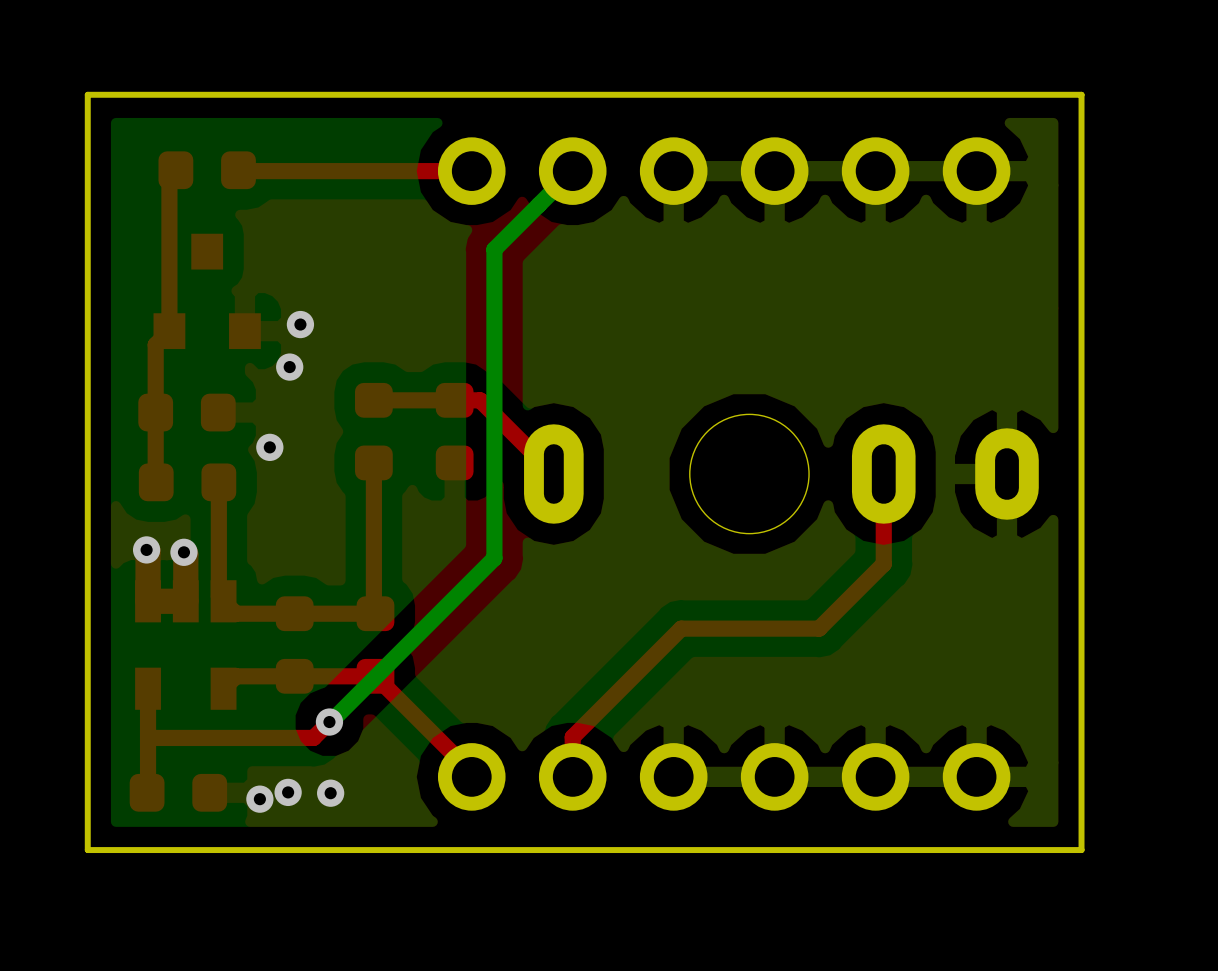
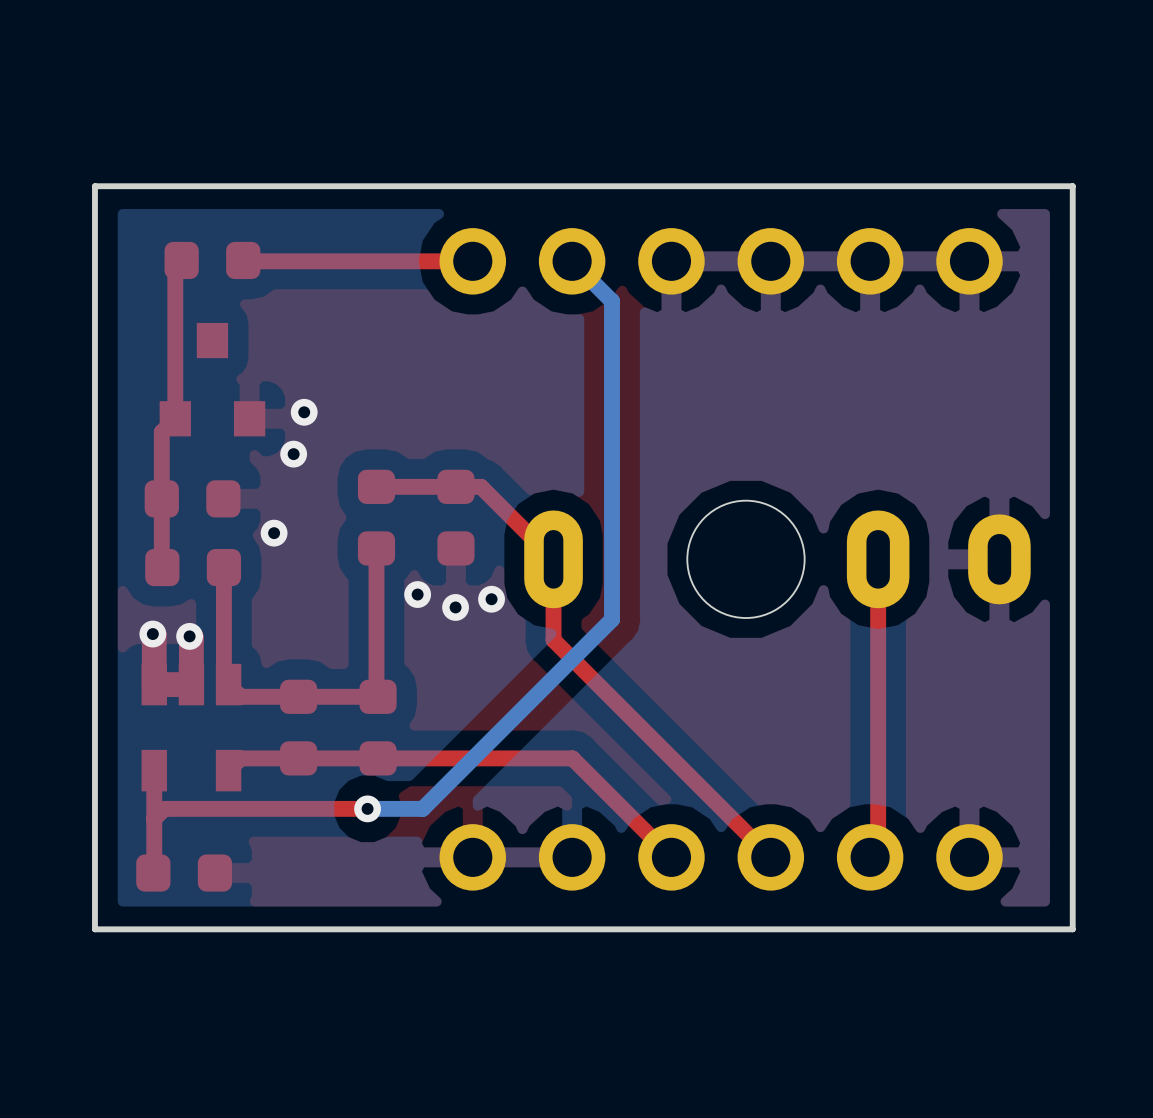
bottom track: (572, 171) (494, 249) (494, 558) (329, 722) -> (572, 261) (612, 301) (612, 619) (422, 808) (367, 808)
top track: none -> (553, 559) (553, 640) (770, 857)
via: none -> (417, 594)
via: none -> (491, 599)
via: none -> (455, 607)
top track: (883, 564) (819, 628) (681, 628) (572, 737) (572, 776) -> (878, 647) (878, 849) (870, 857)
top track: (375, 676) (471, 772) -> (378, 758) (572, 758) (671, 857)
top track: (329, 722) (313, 737) (148, 737) -> (367, 808) (164, 808) (154, 819)
via position: (329, 722) -> (367, 808)
via: (288, 792) -> none
via: (330, 793) -> none
via: (259, 799) -> none

